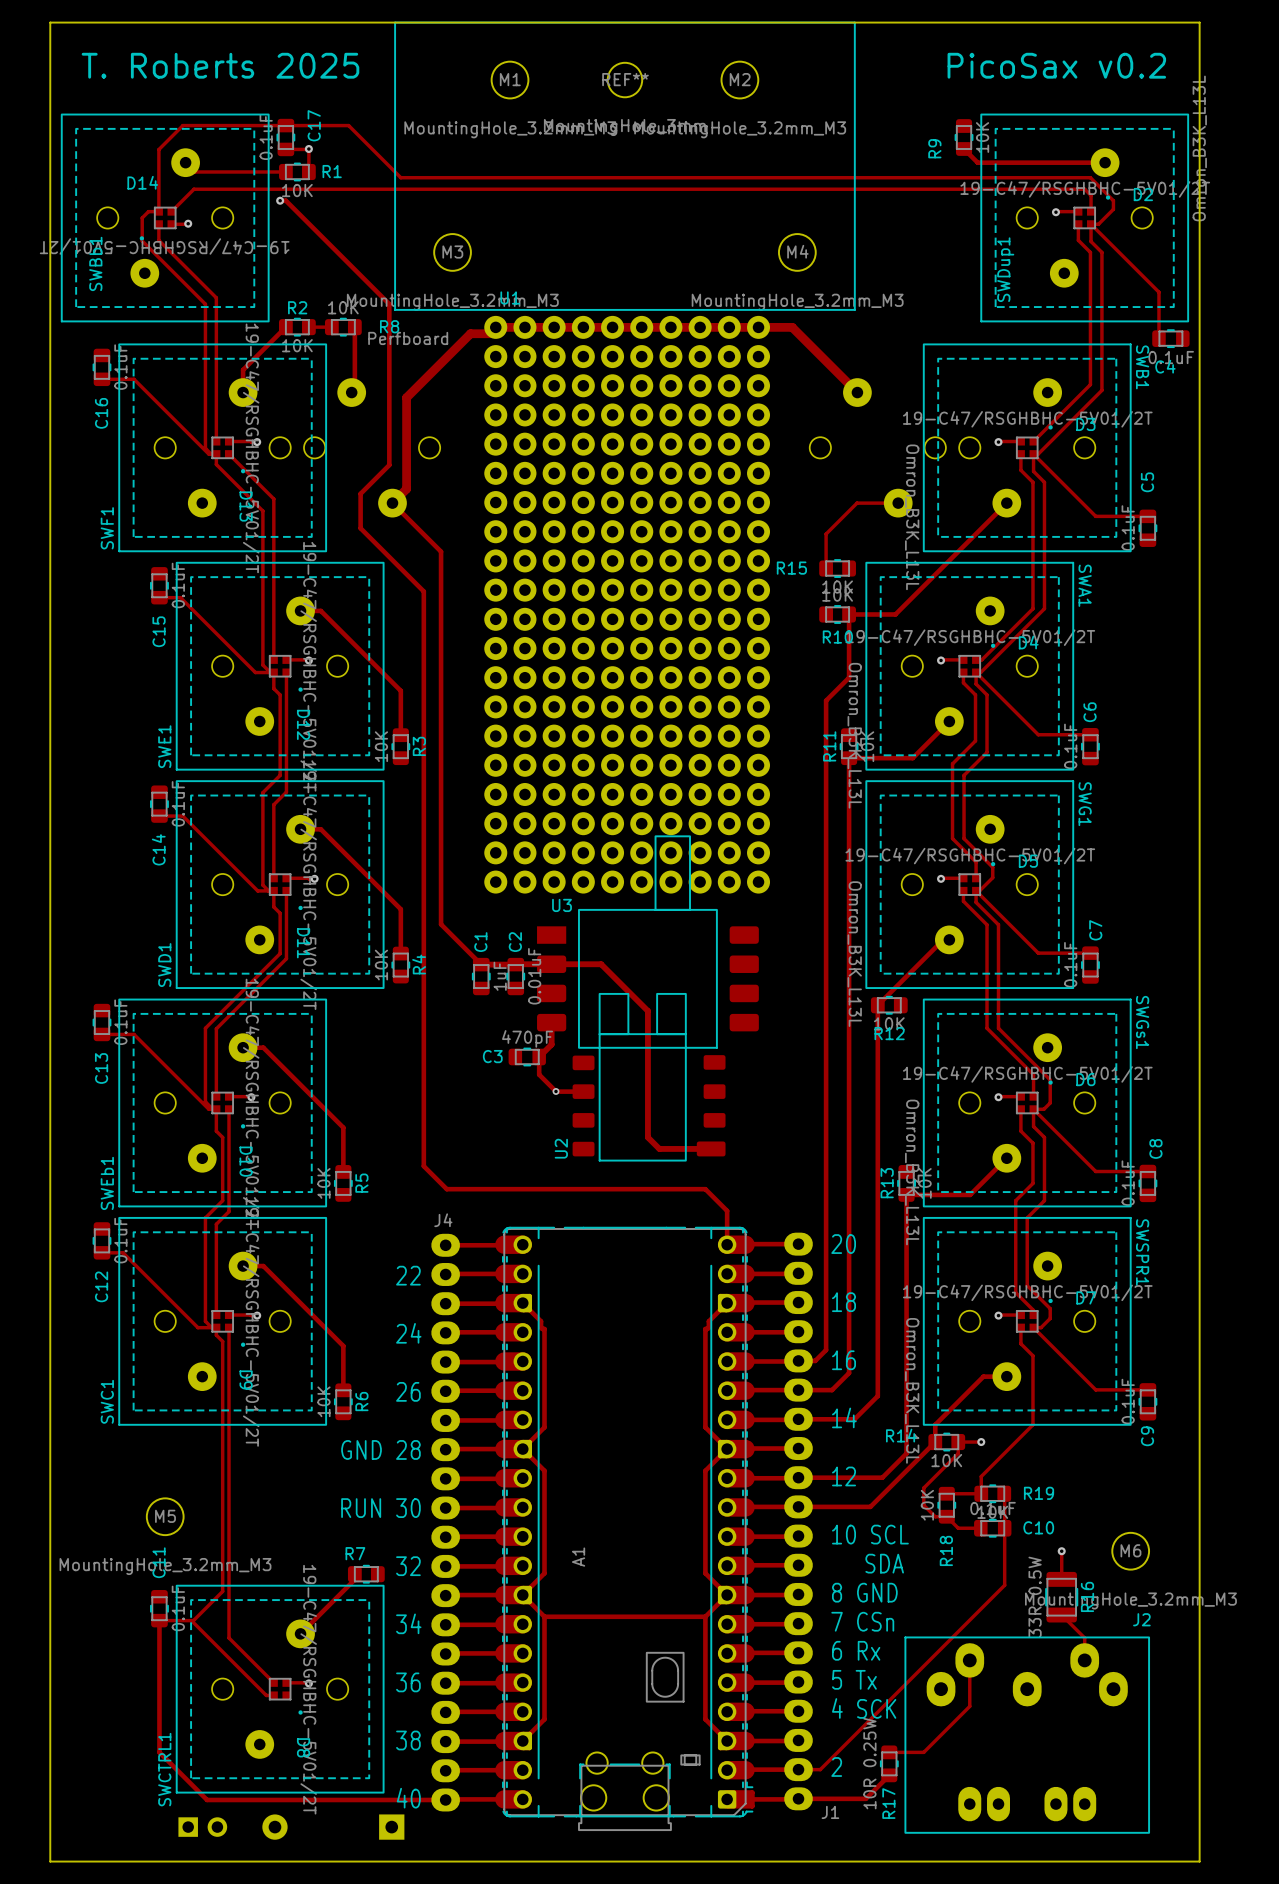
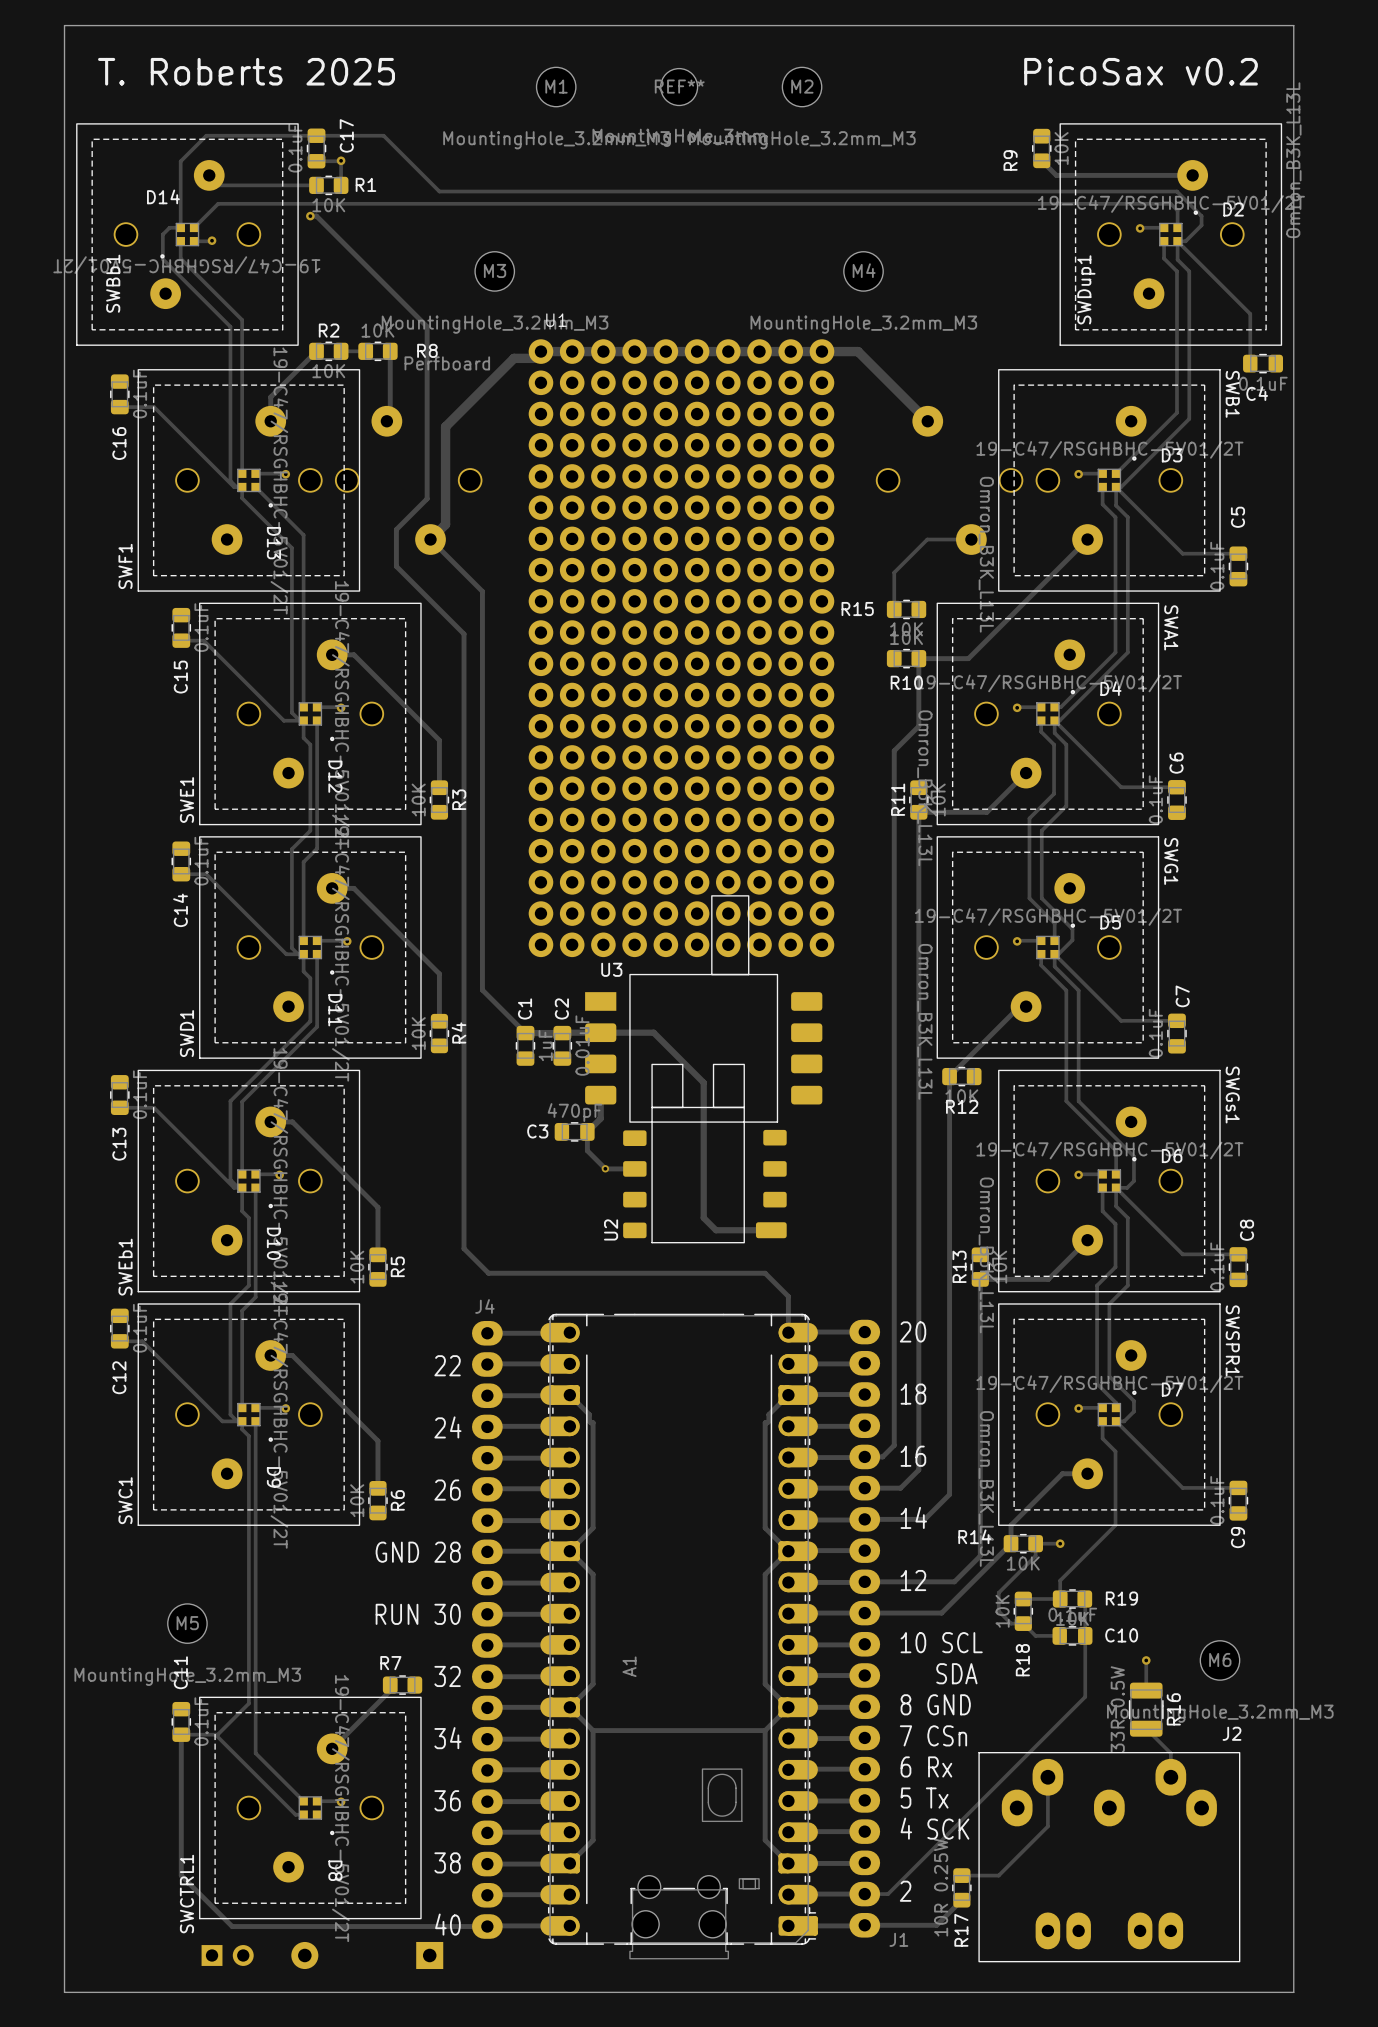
line: (395, 22) (854, 22) (854, 309) (395, 309) (395, 22) -> none

